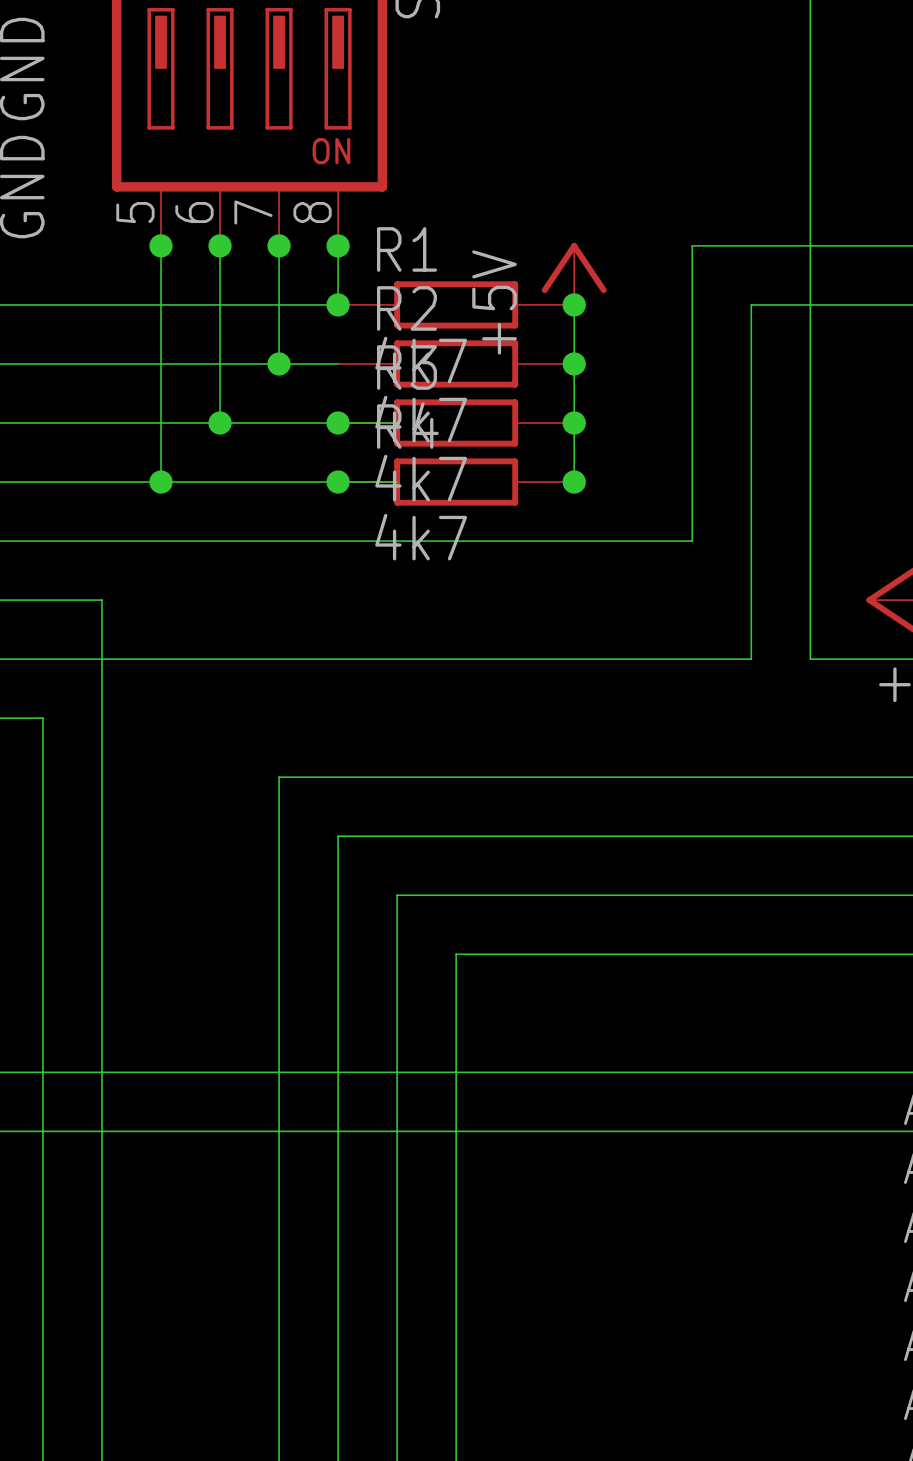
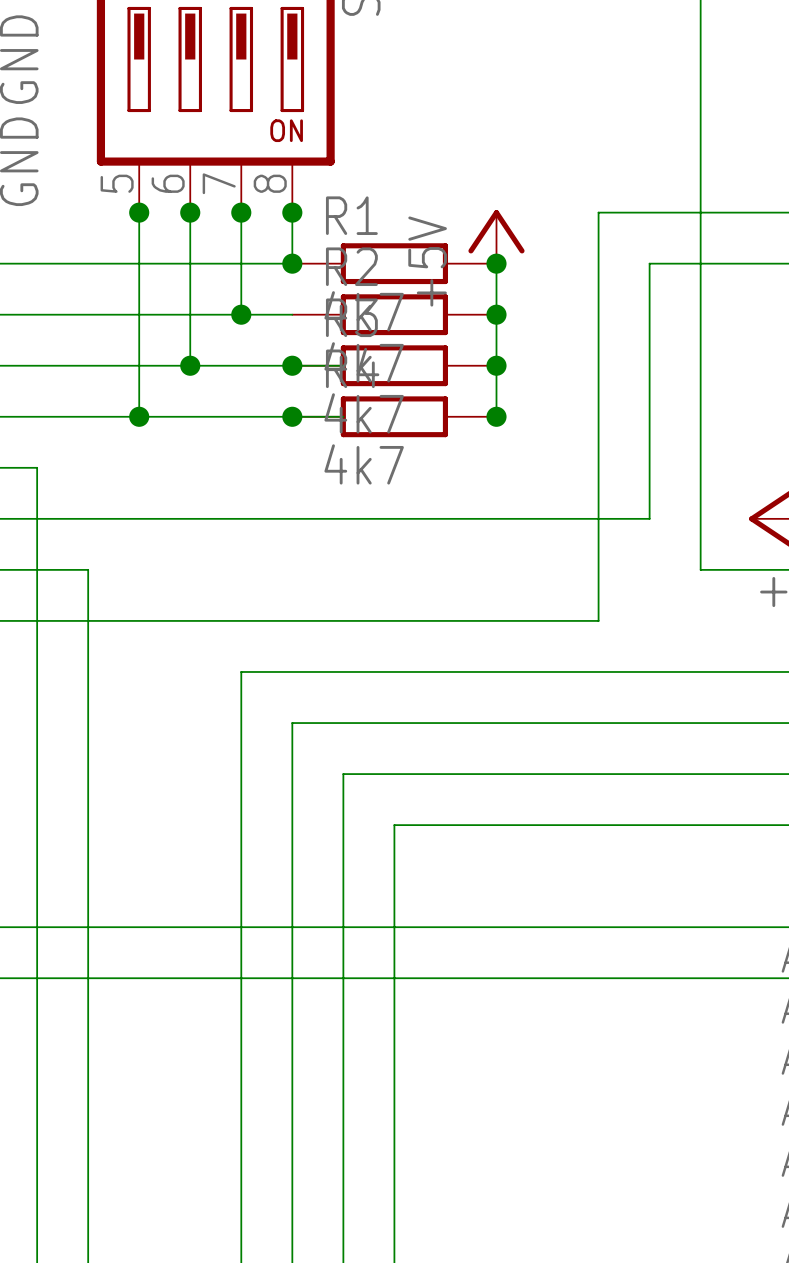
wire: (42, 541) (692, 541) -> (37, 467) (37, 620) (598, 620) (598, 467)
wire: (101, 600) (101, 659) (751, 659) (751, 600) -> (88, 518) (649, 518)

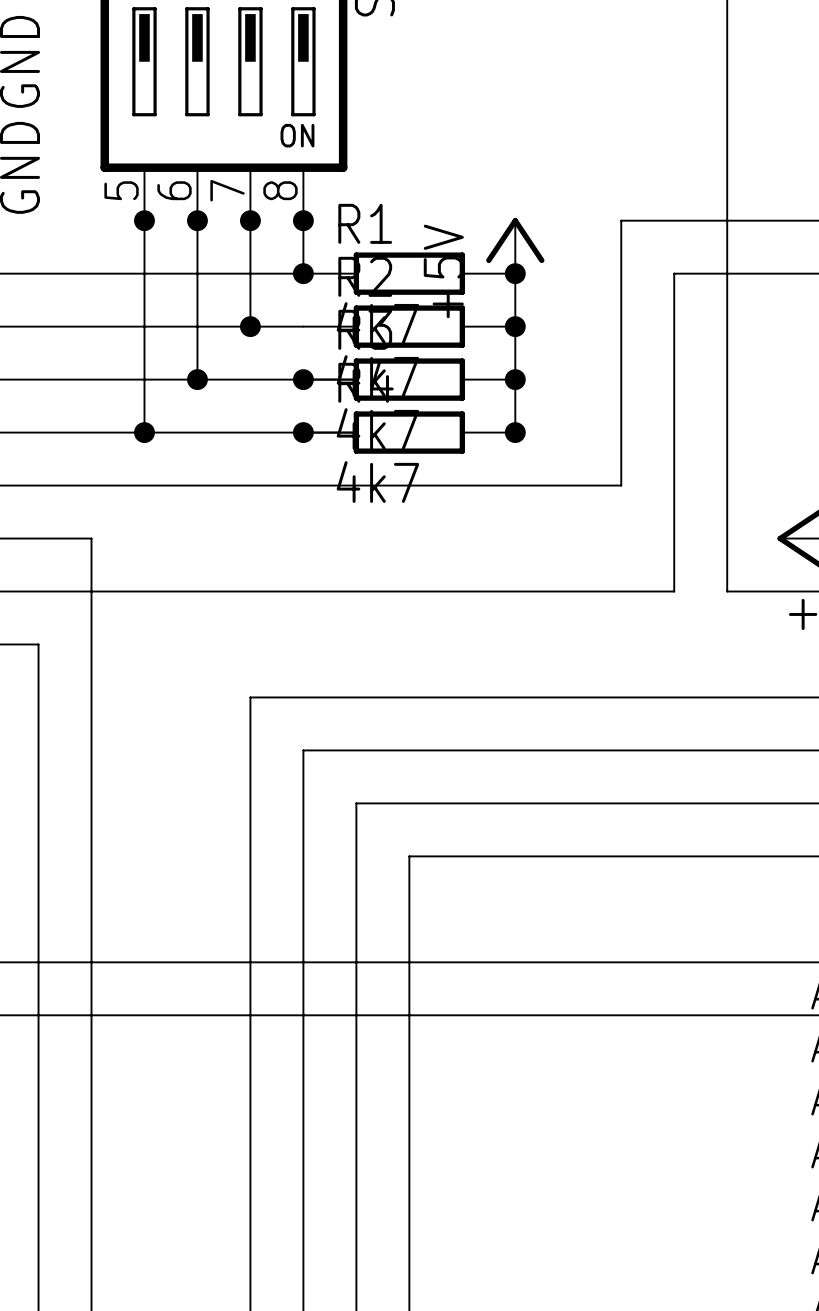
wire: (37, 467) (37, 620) (598, 620) (598, 467) -> (38, 485) (621, 485)
wire: (88, 518) (649, 518) -> (91, 538) (91, 591) (674, 591) (674, 538)

